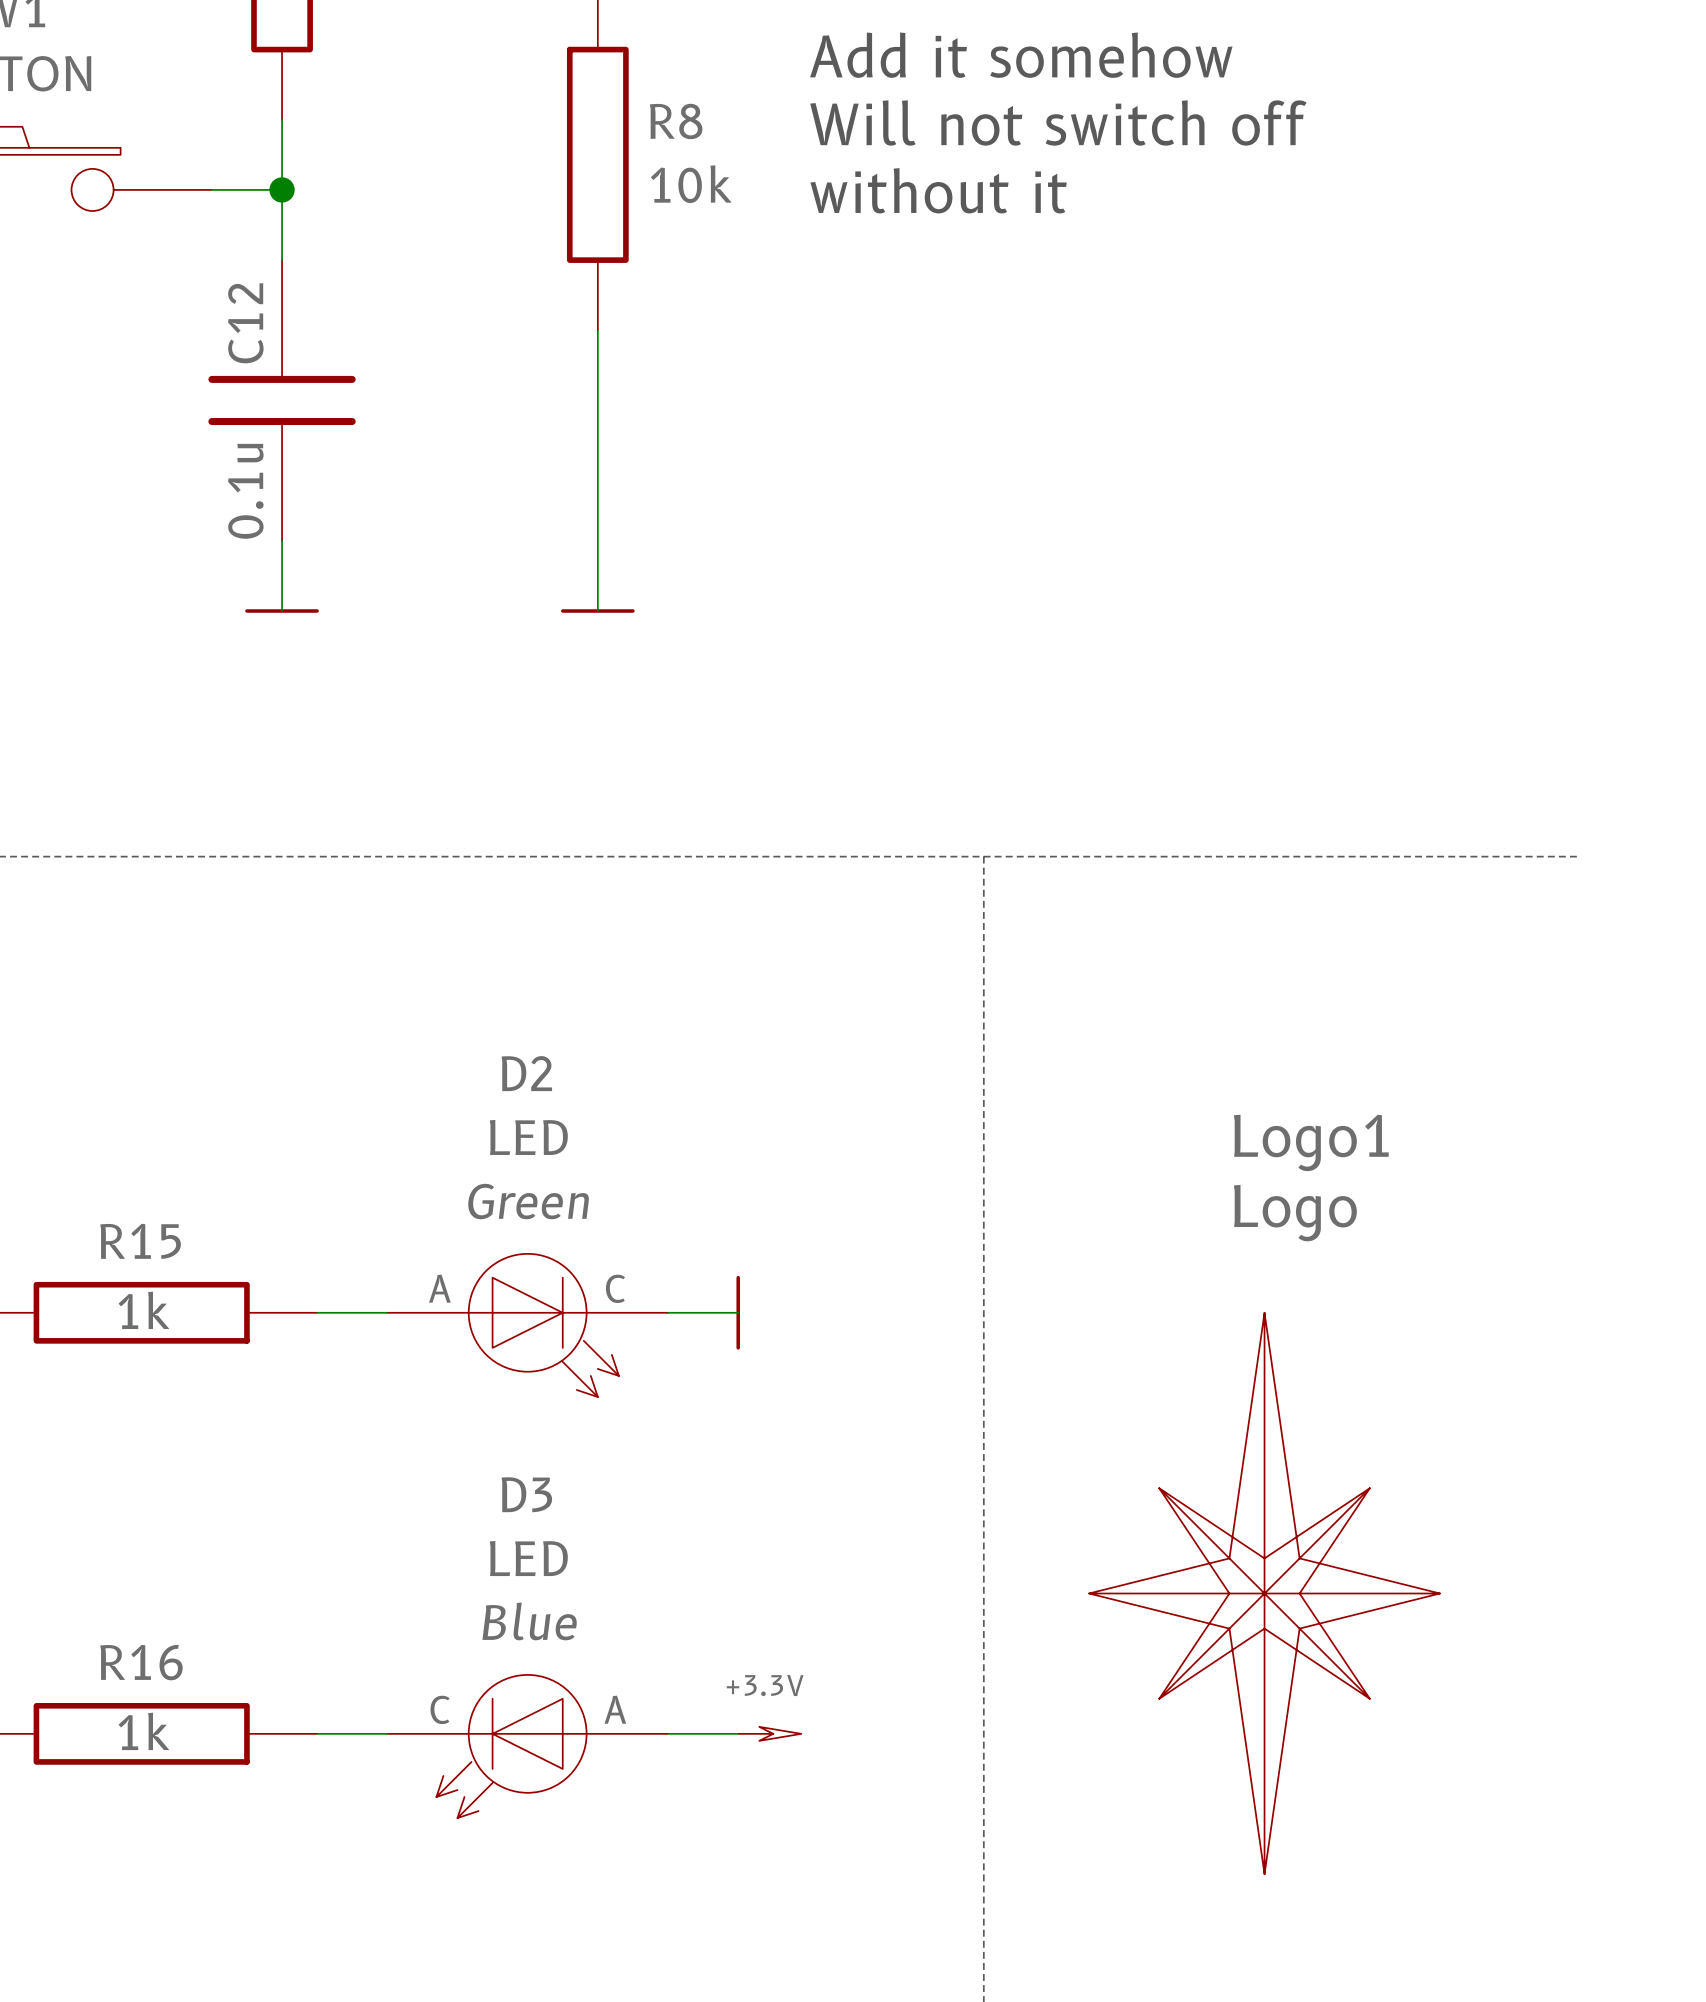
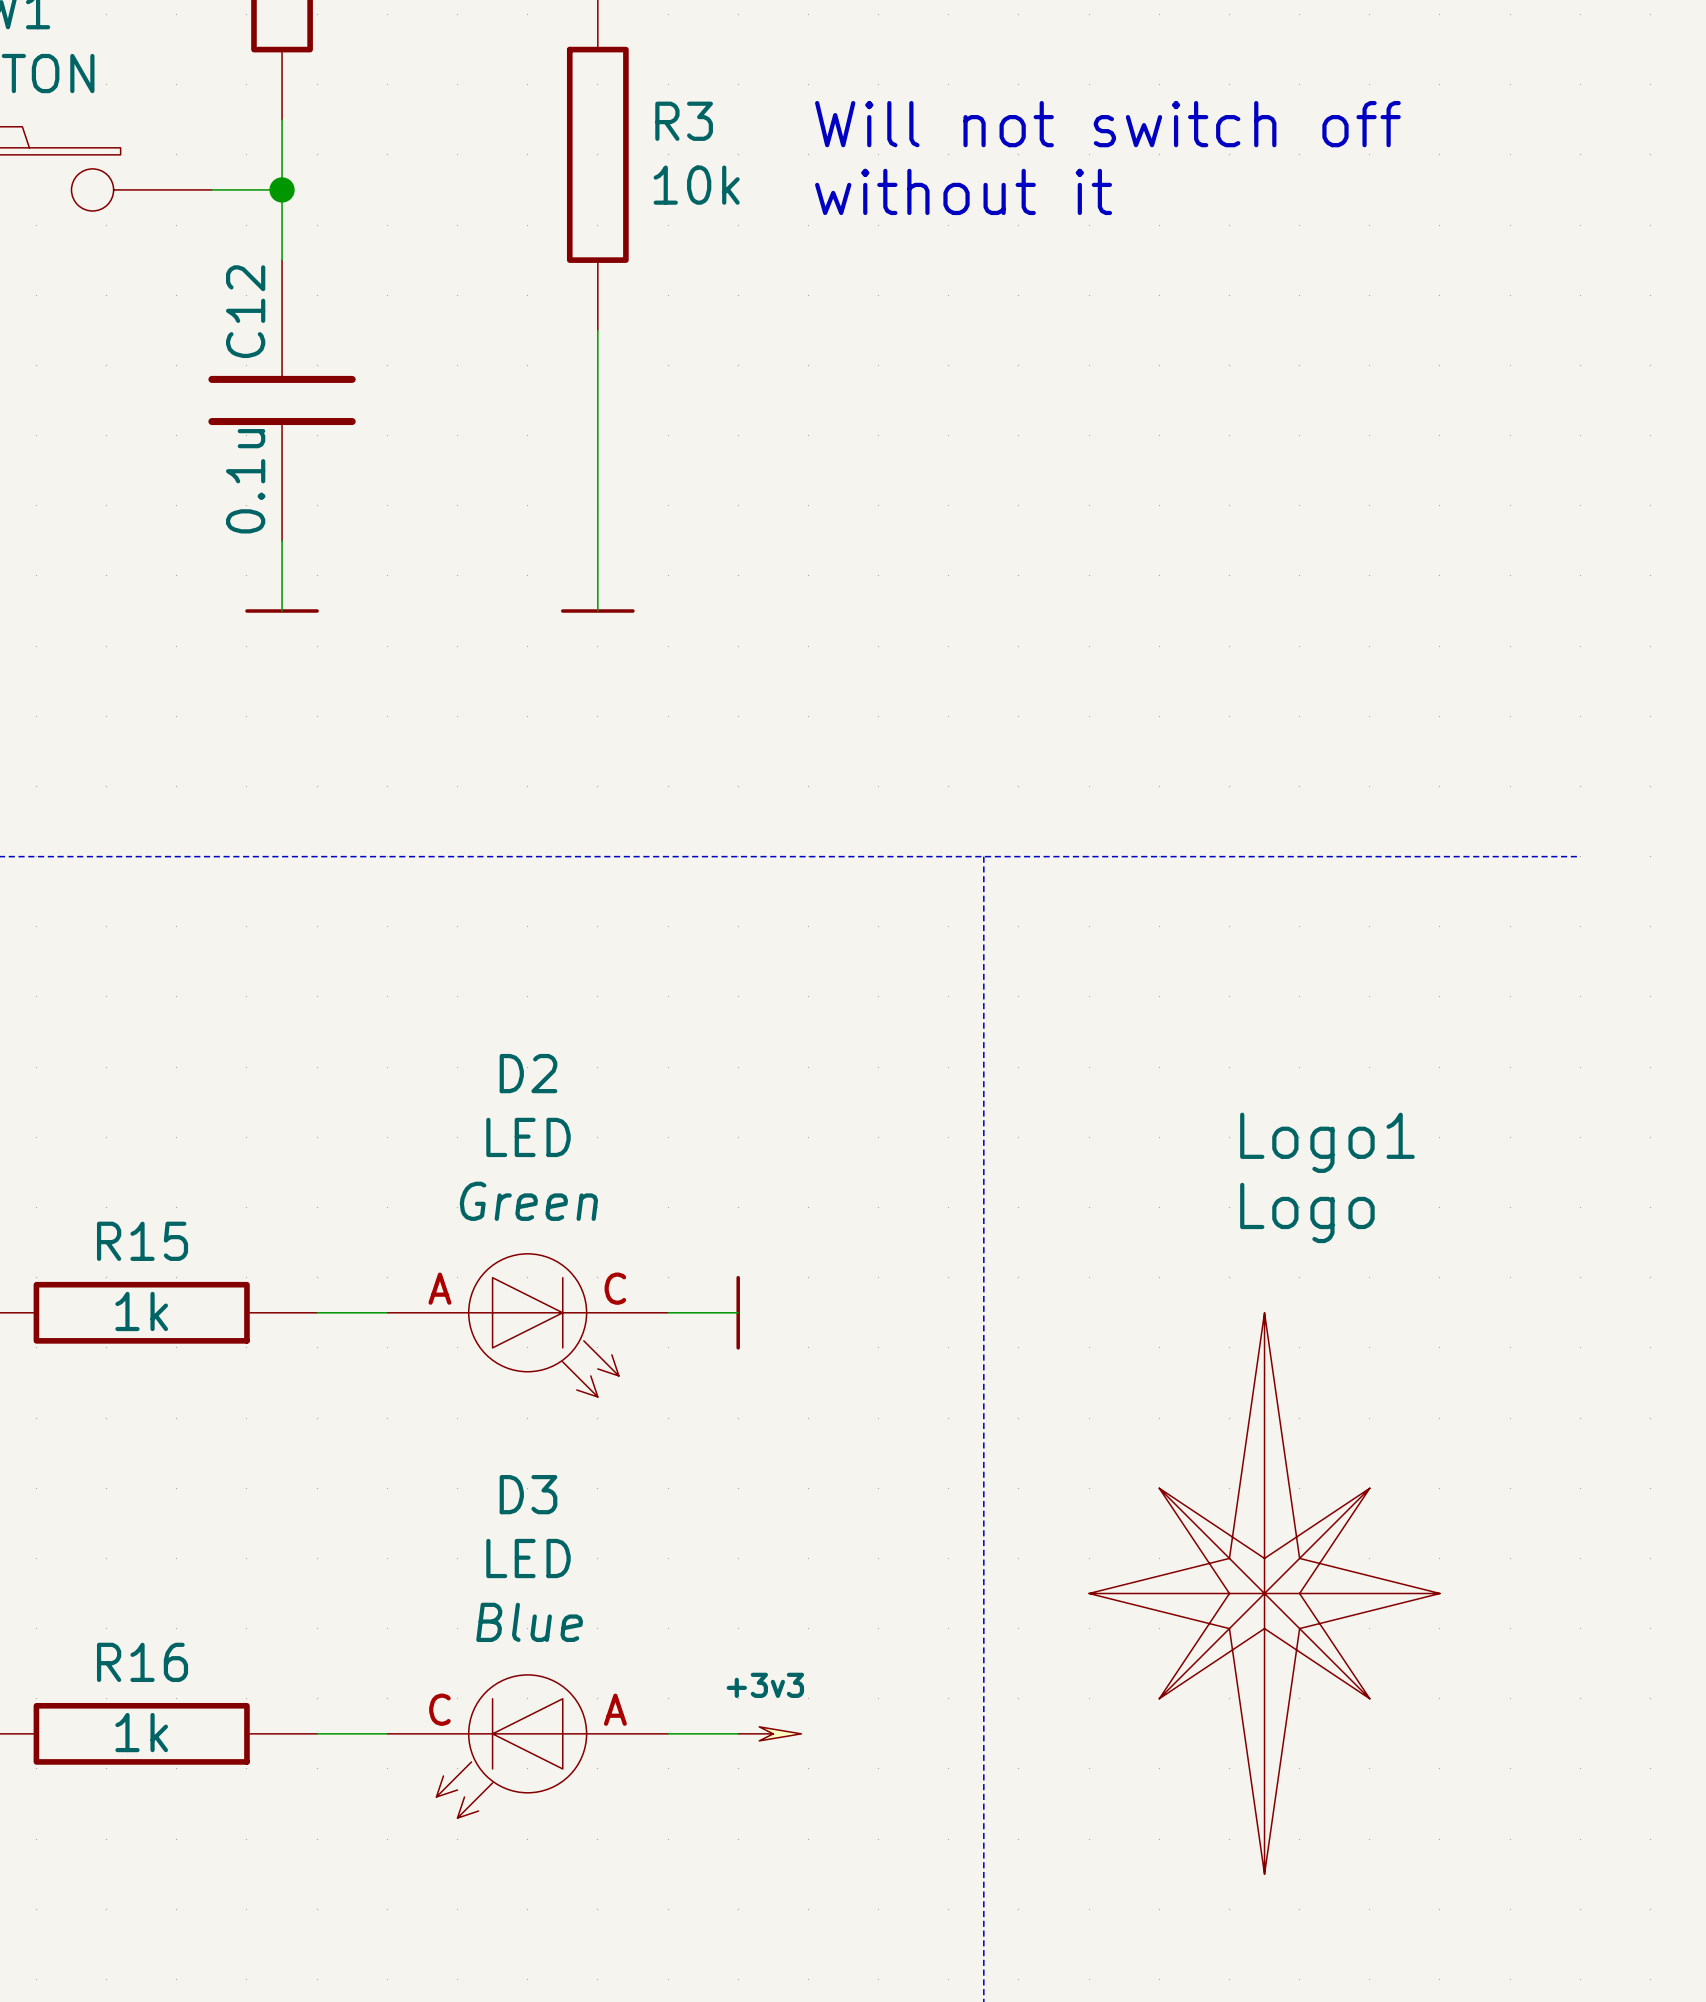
text: Add it somehow (1021, 55) -> none
R8 name: R8 (676, 121) -> R3 (684, 121)
power symbol: +3.3V (769, 1733) -> +3v3 (769, 1733)

